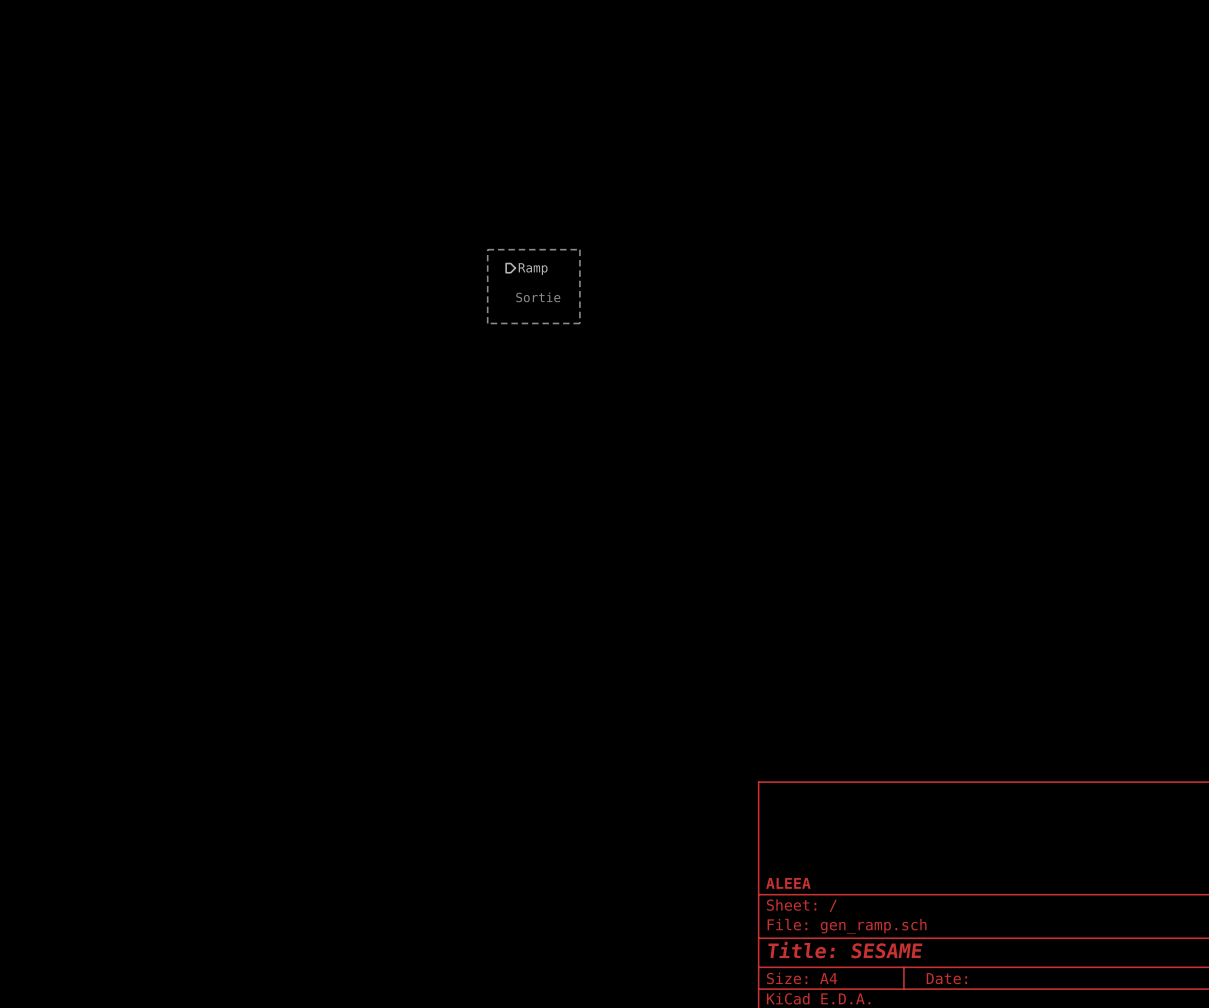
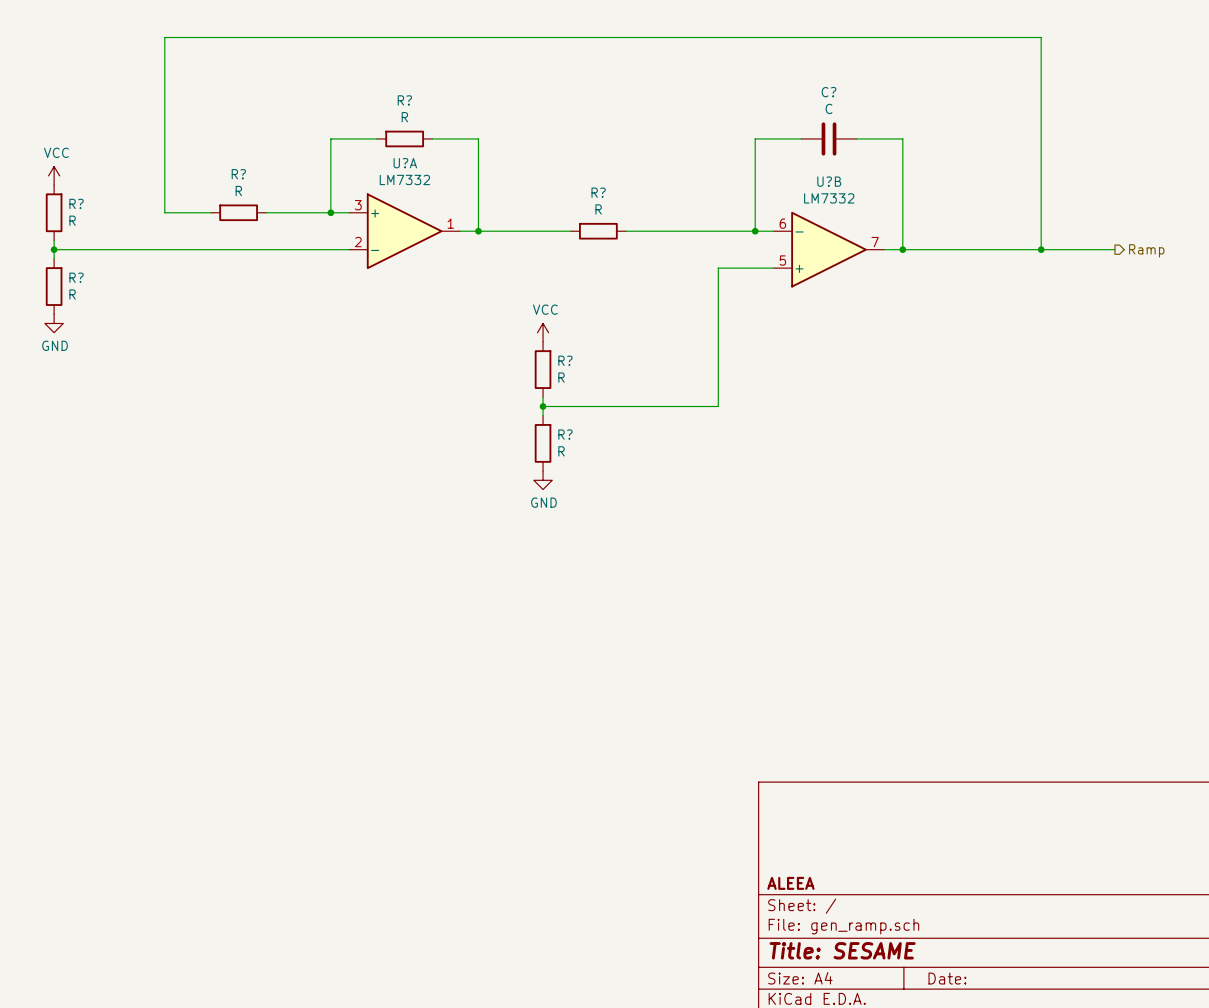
wire: none -> (376, 138) (330, 138) (330, 212)
R?: none -> R (404, 138)
wire: none -> (432, 138) (478, 138) (478, 231)
wire: none -> (801, 138) (755, 138) (755, 231)
C?: none -> C (829, 138)
wire: none -> (856, 138) (902, 138) (902, 249)
power symbol: none -> VCC (54, 175)
R?: none -> R (54, 212)
wire: none -> (210, 212) (164, 212) (164, 37) (1041, 37) (1041, 249)
R?: none -> R (238, 212)
wire: none -> (266, 212) (349, 212)
junction: none -> (330, 212)
U?A: none -> LM7332 (404, 231)
wire: none -> (460, 231) (570, 231)
junction: none -> (478, 231)
R?: none -> R (598, 231)
wire: none -> (626, 231) (773, 231)
junction: none -> (755, 231)
wire: none -> (54, 240) (54, 258)
wire: none -> (54, 249) (349, 249)
junction: none -> (54, 249)
line: (487, 249) (579, 249) (579, 323) (487, 323) (487, 249) -> none
U?B: none -> LM7332 (829, 249)
wire: none -> (884, 249) (1114, 249)
junction: none -> (902, 249)
junction: none -> (1041, 249)
hierarchical label: none -> Ramp (1146, 250)
wire: none -> (773, 268) (718, 268) (718, 406) (543, 406)
hierarchical label: Ramp (533, 269) -> none
R?: none -> R (54, 286)
text: Sortie (538, 297) -> none
power symbol: none -> GND (54, 323)
power symbol: none -> VCC (543, 332)
R?: none -> R (543, 369)
wire: none -> (543, 397) (543, 415)
junction: none -> (543, 406)
R?: none -> R (543, 443)
power symbol: none -> GND (543, 480)

